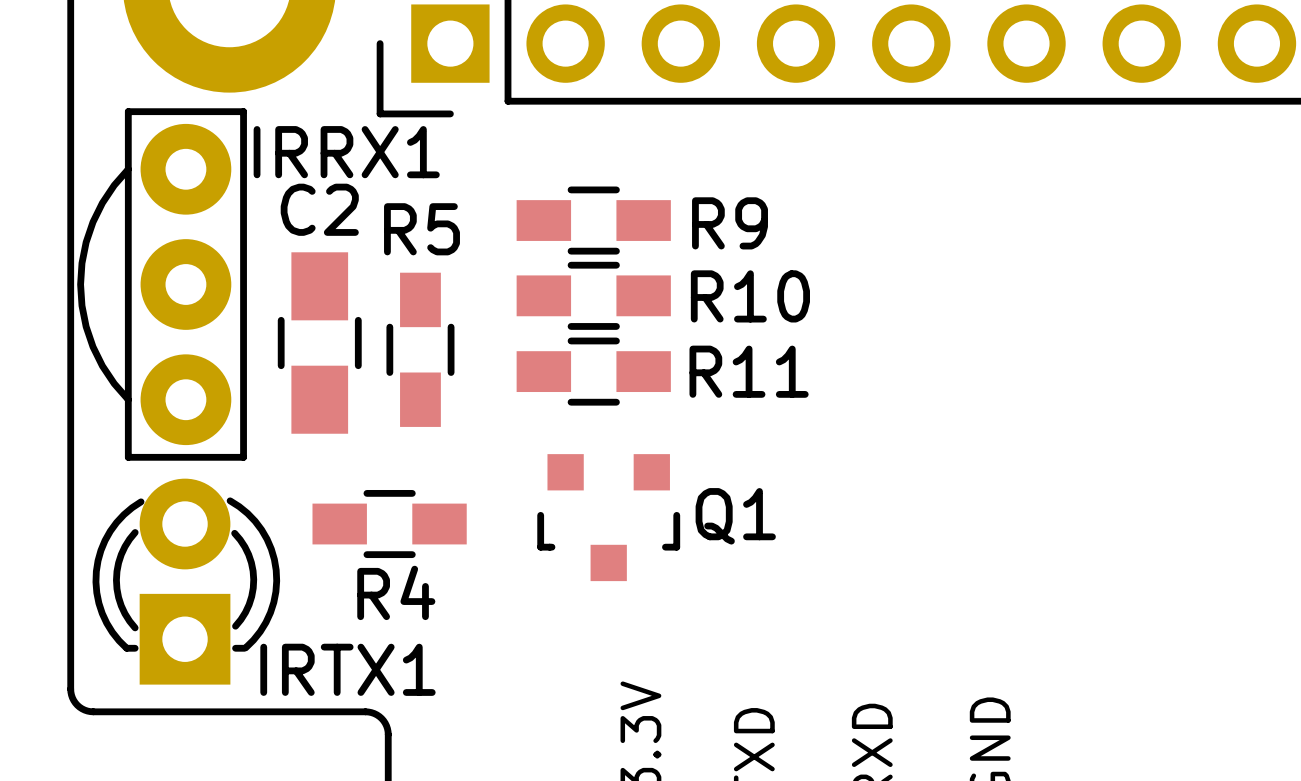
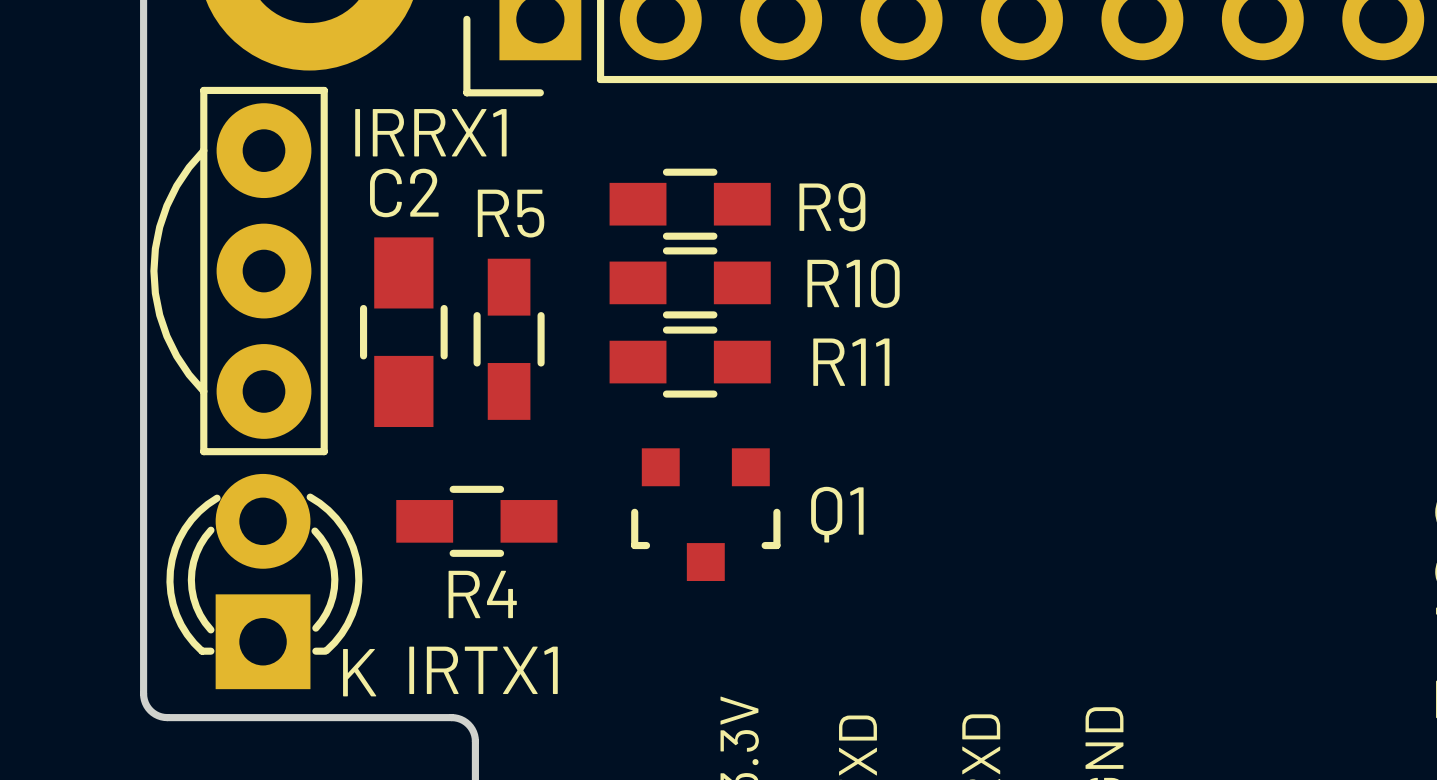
IRTX1 text: none -> K (359, 672)
IRTX1 name position: IRTX1 (347, 669) -> IRTX1 (483, 670)

